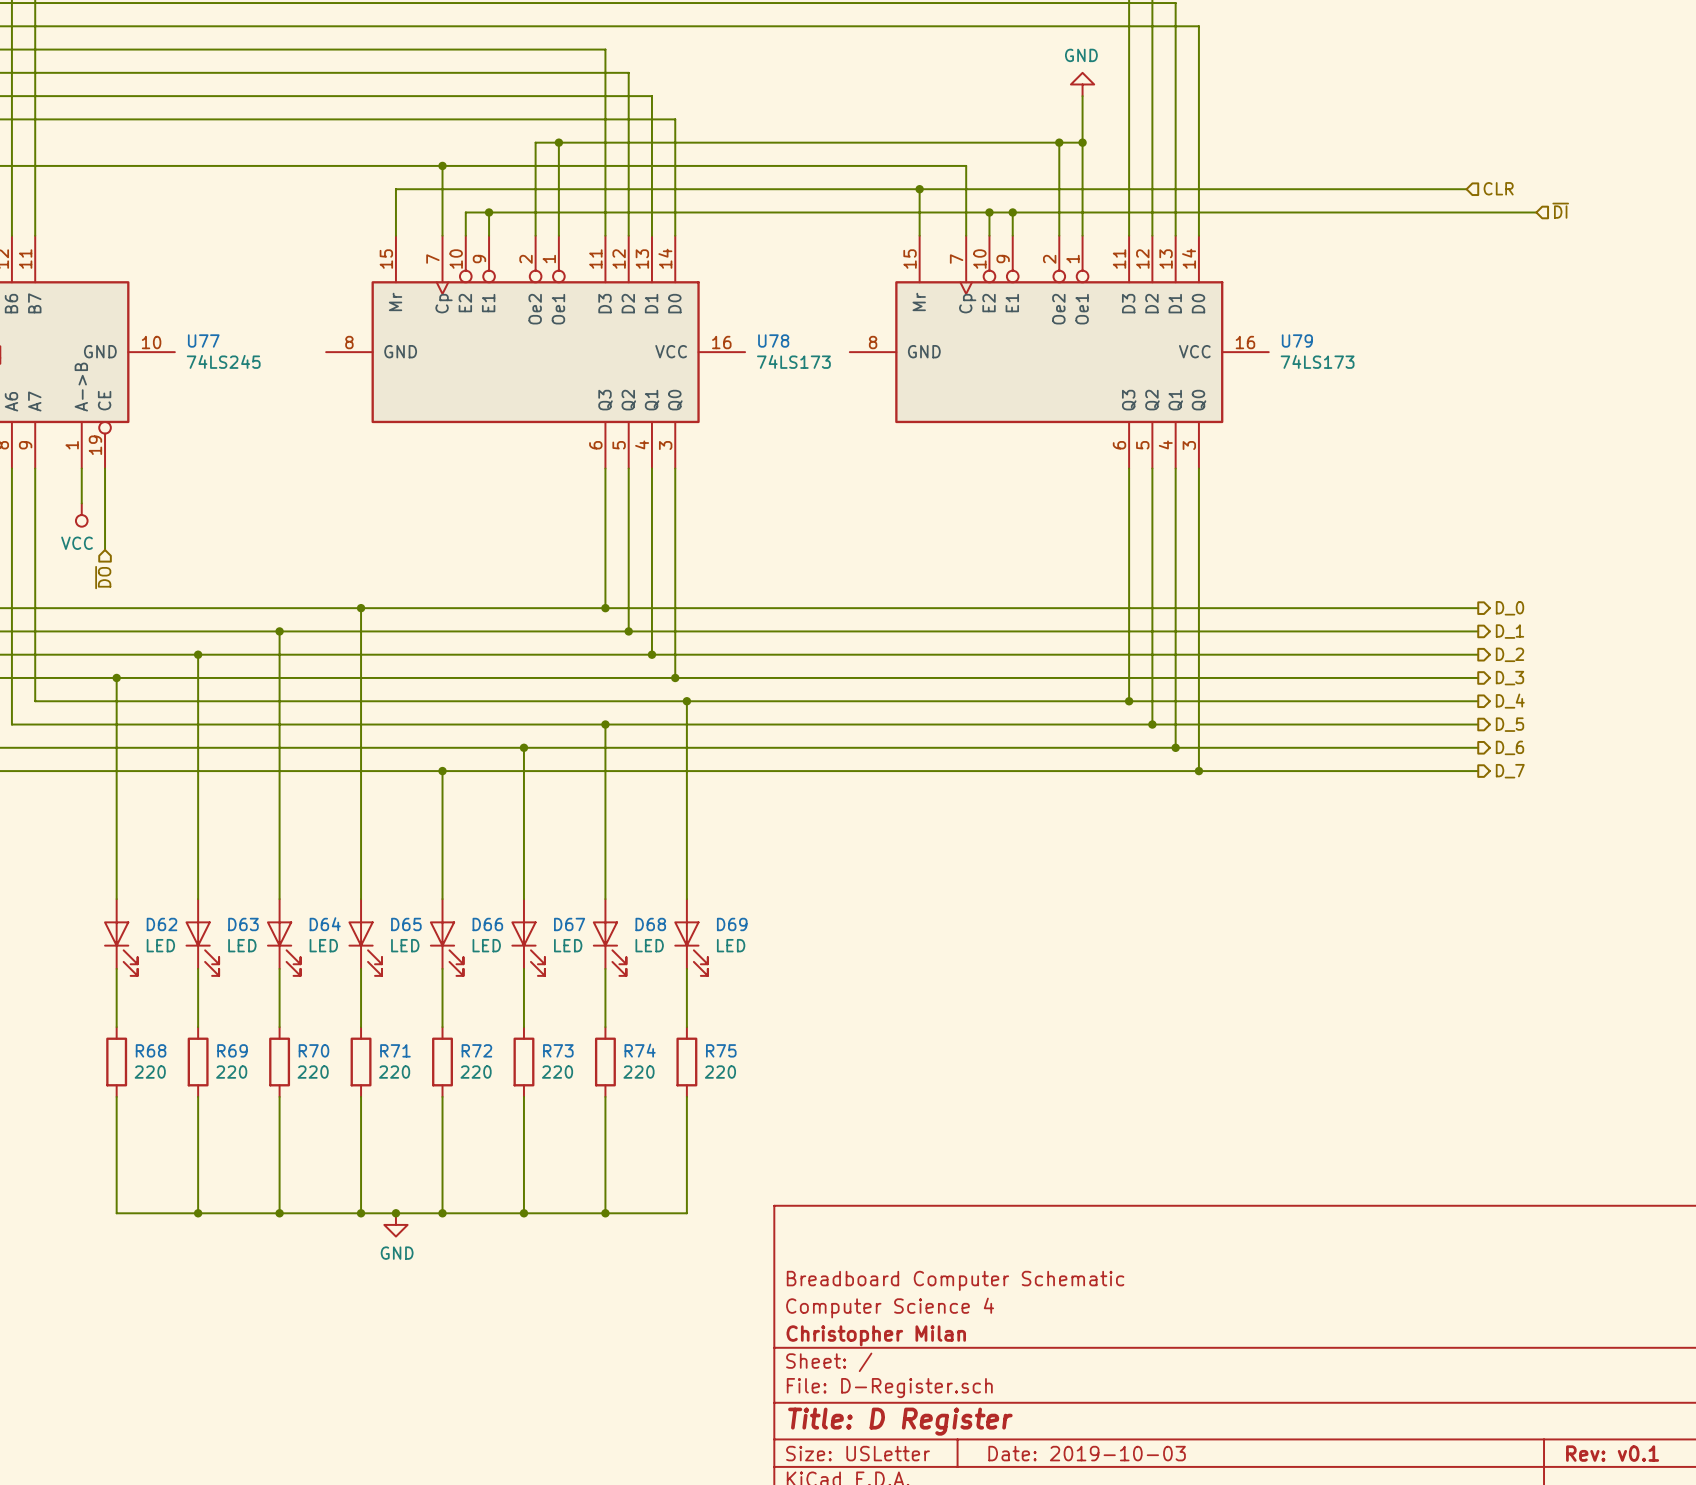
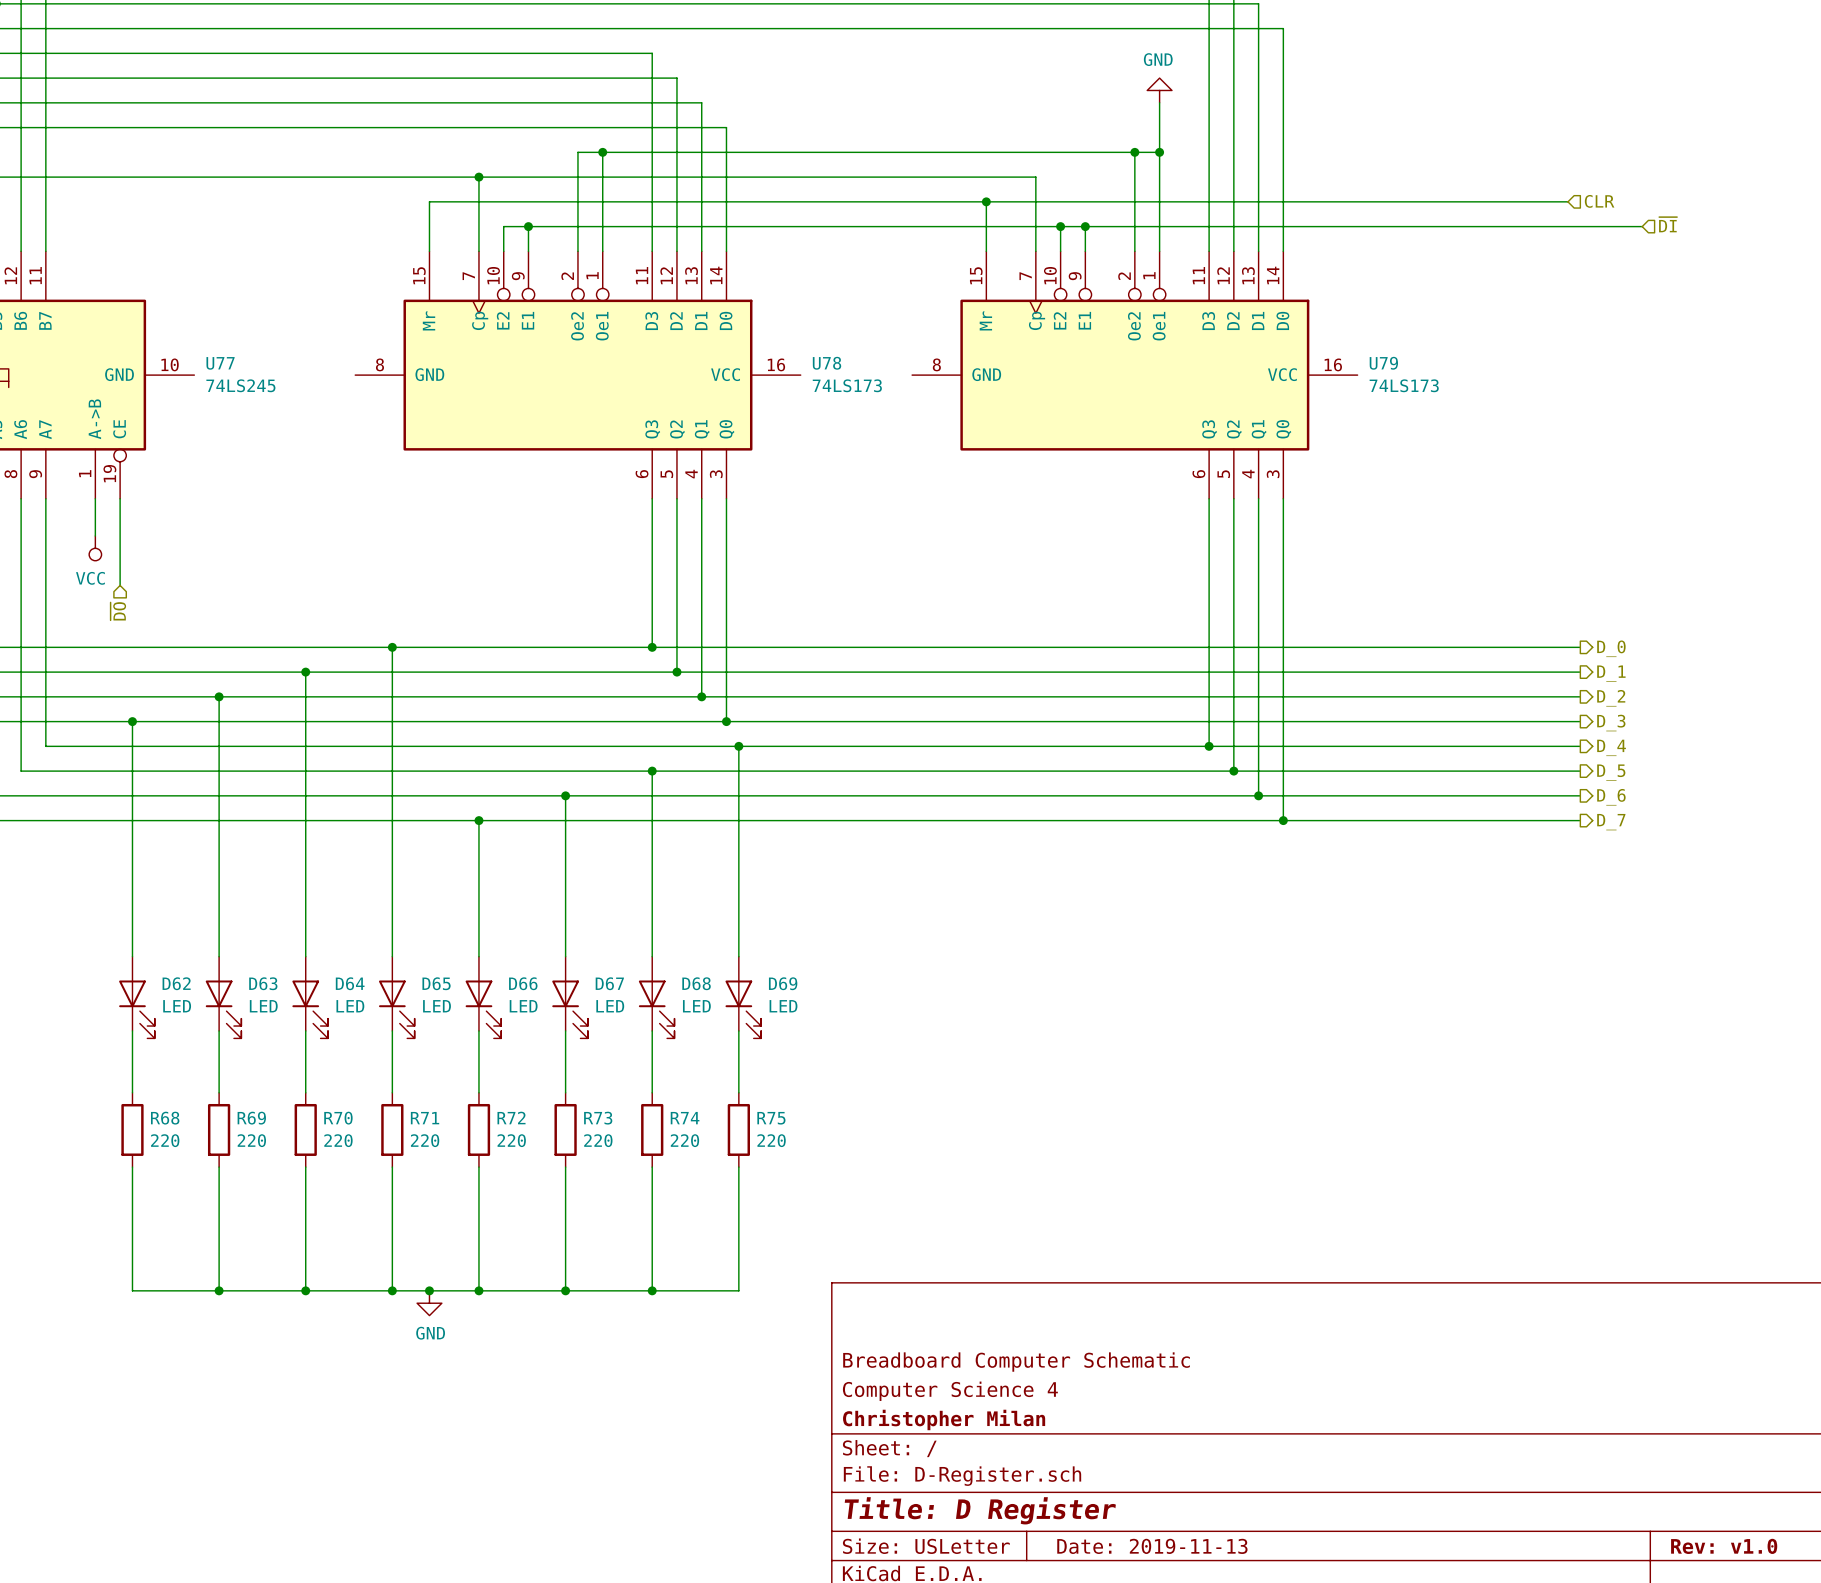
title block: Date: 2019-10-03 (1087, 1453) -> Date: 2019-11-13 (1152, 1546)
title block: Rev: v0.1 (1612, 1453) -> Rev: v1.0 (1724, 1546)

